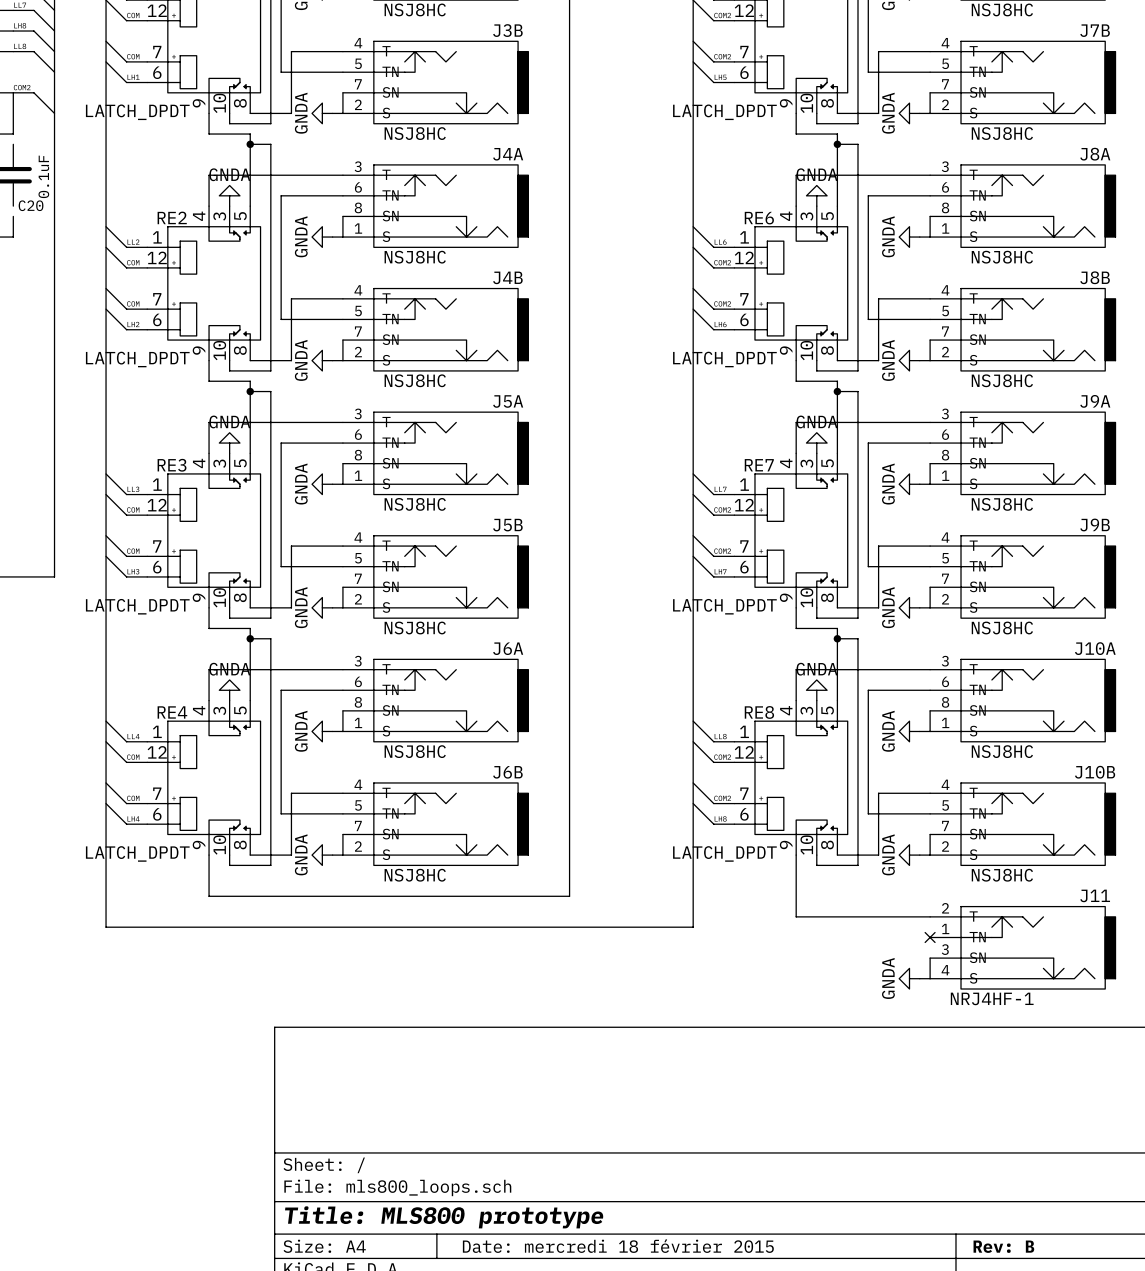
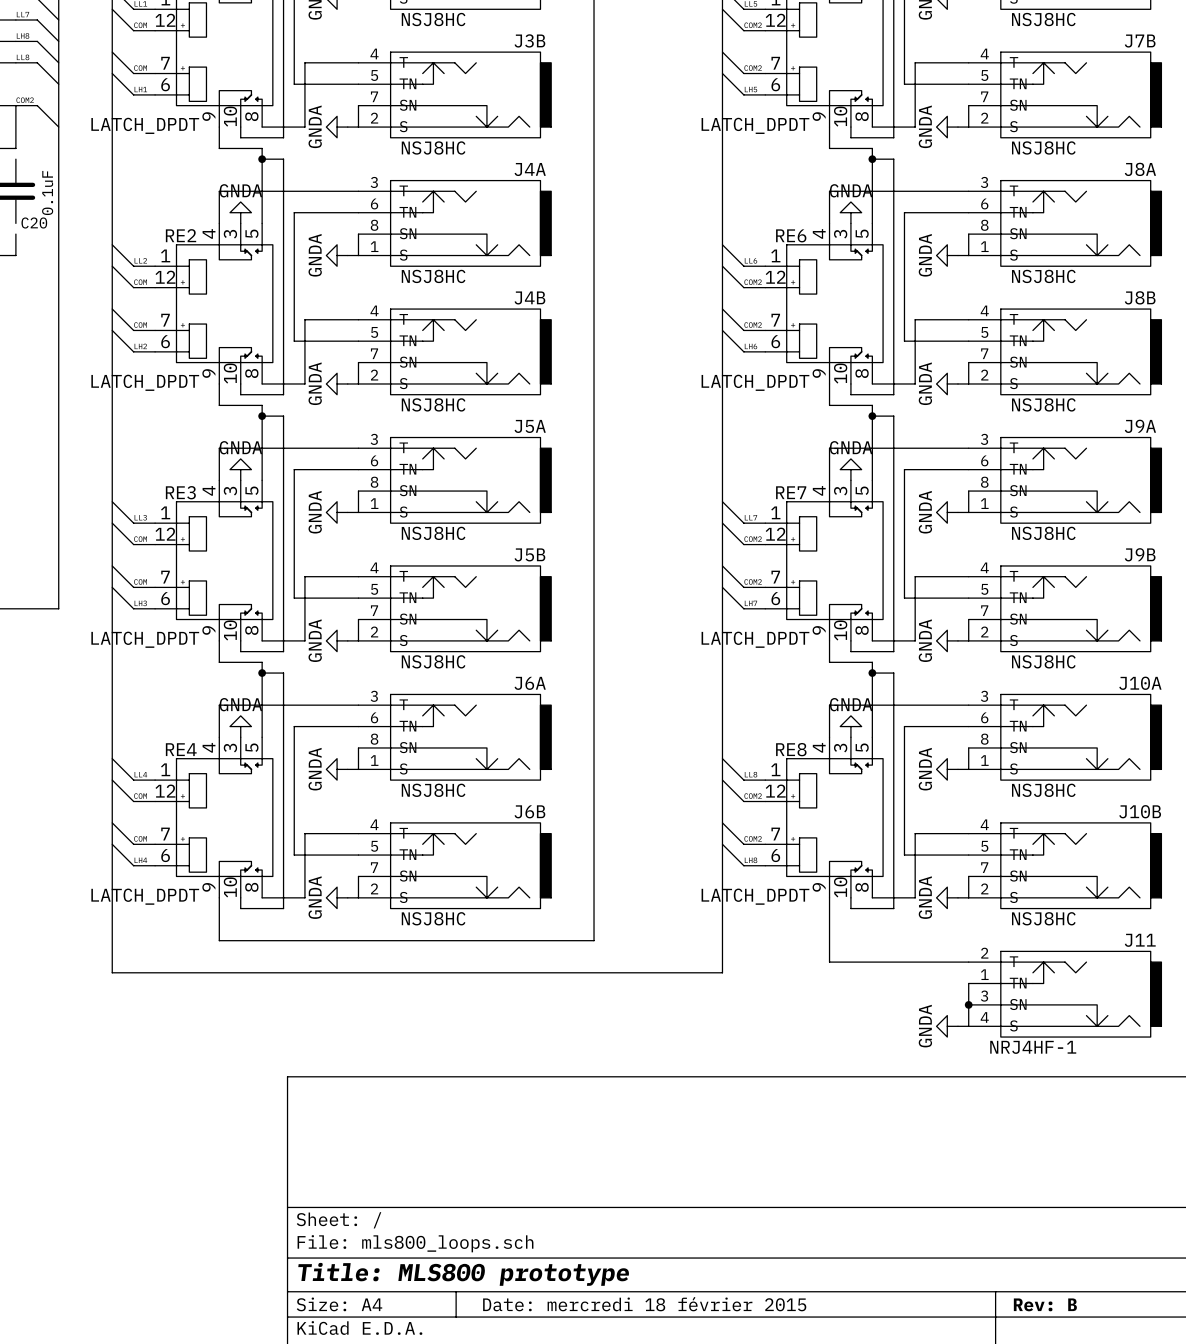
wire: none -> (968, 983) (968, 1004)
no-connect mark: (930, 937) -> none
junction: none -> (968, 1004)

